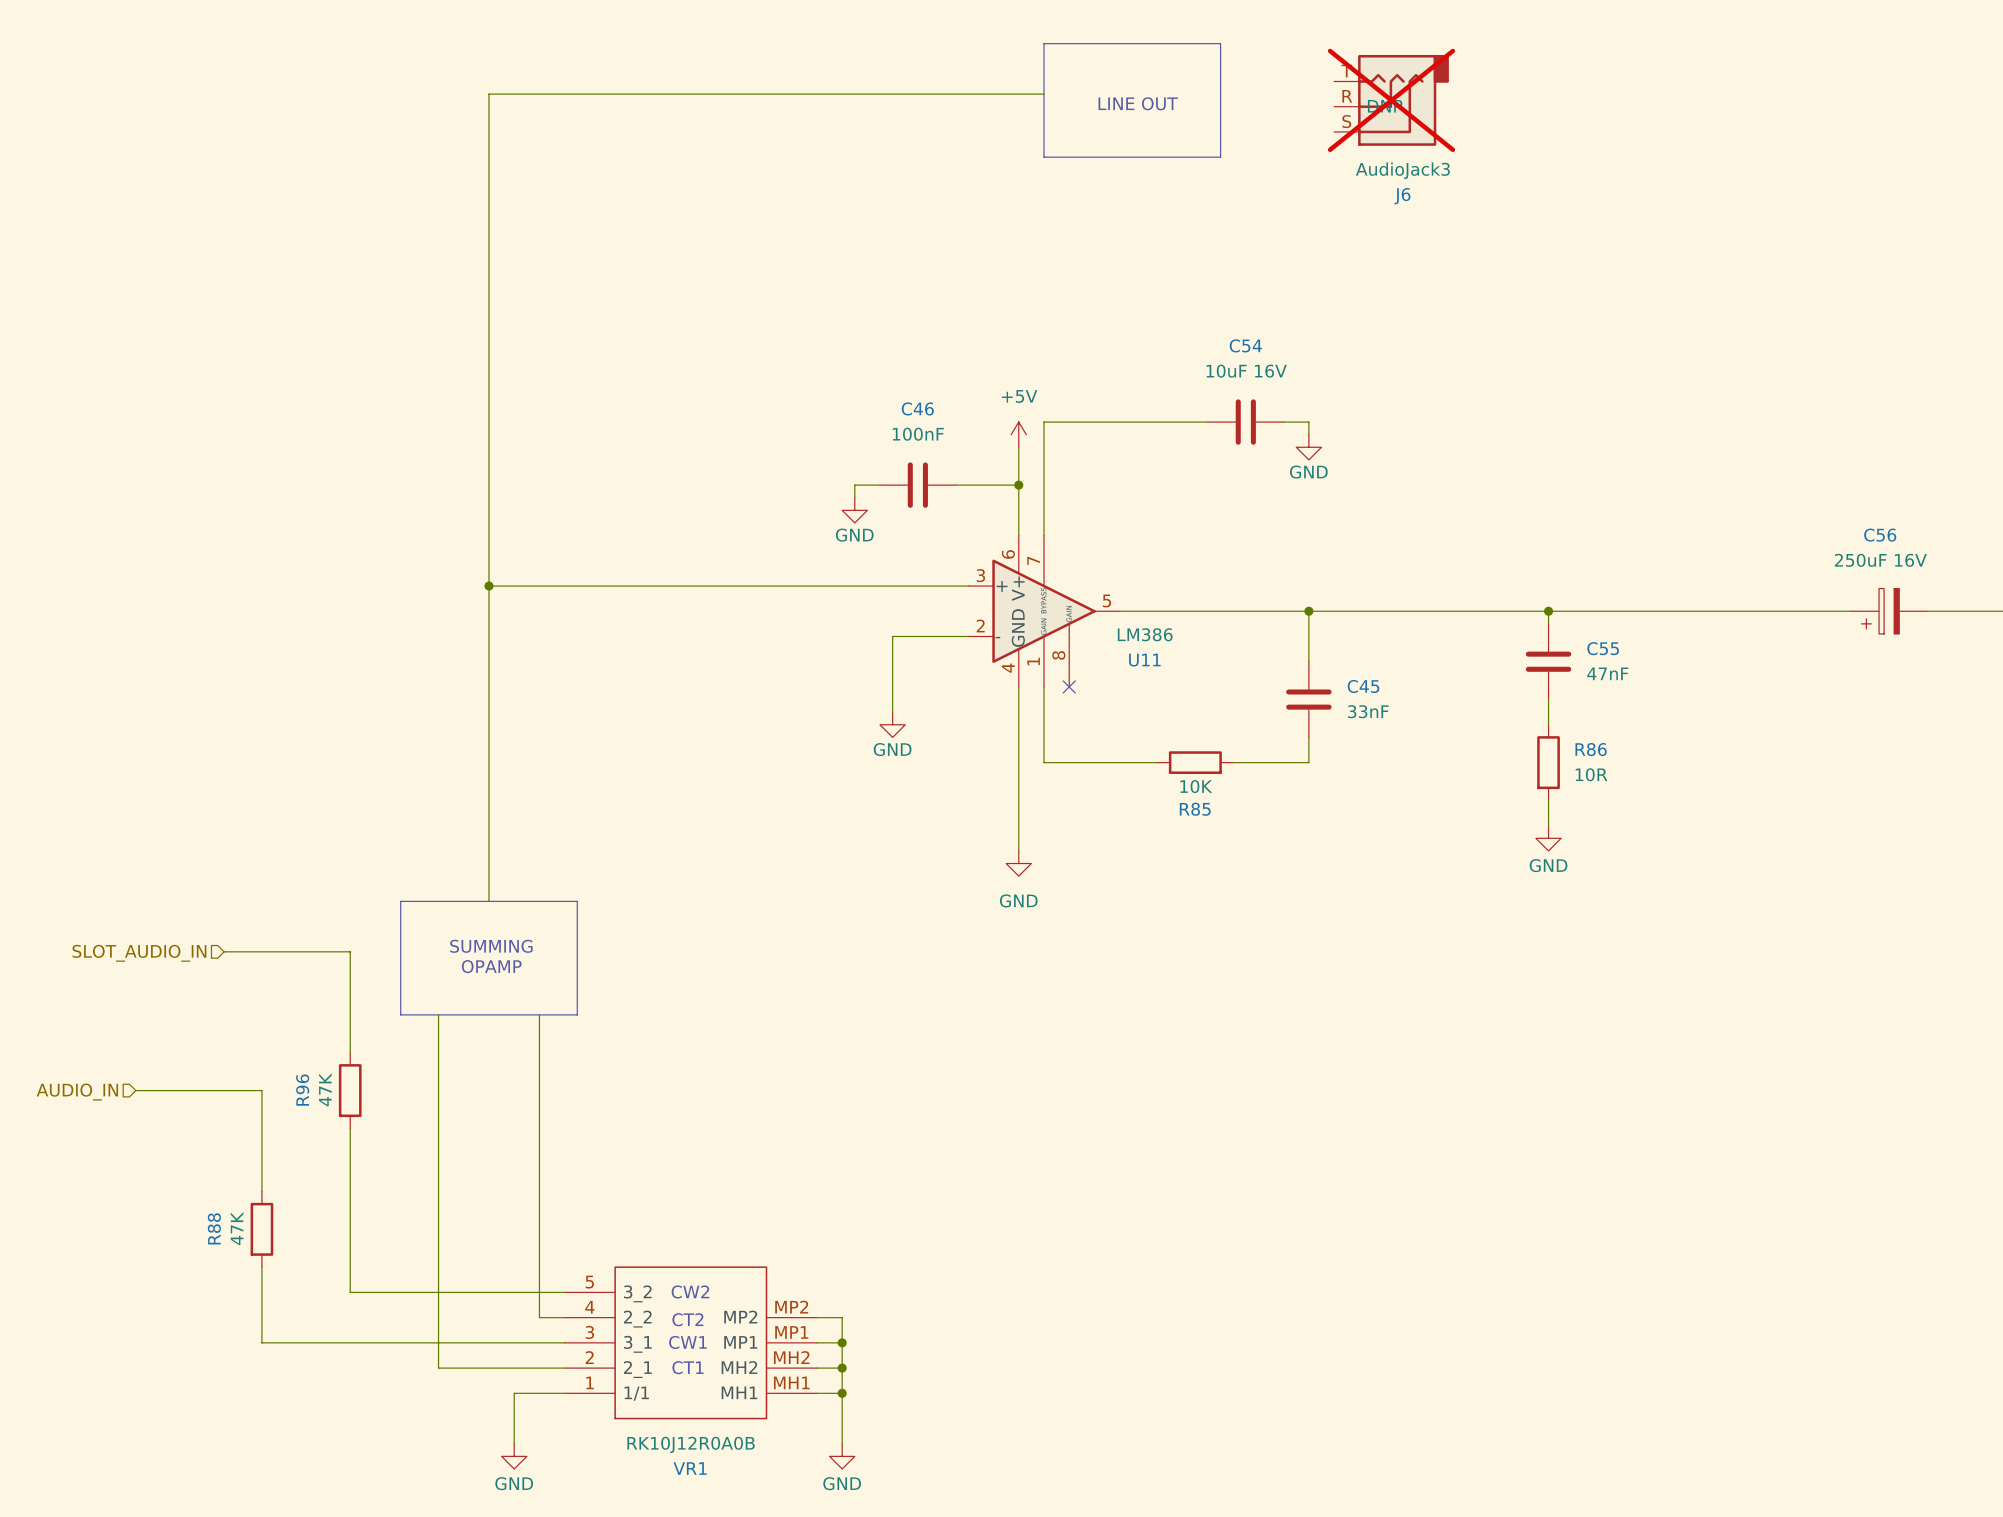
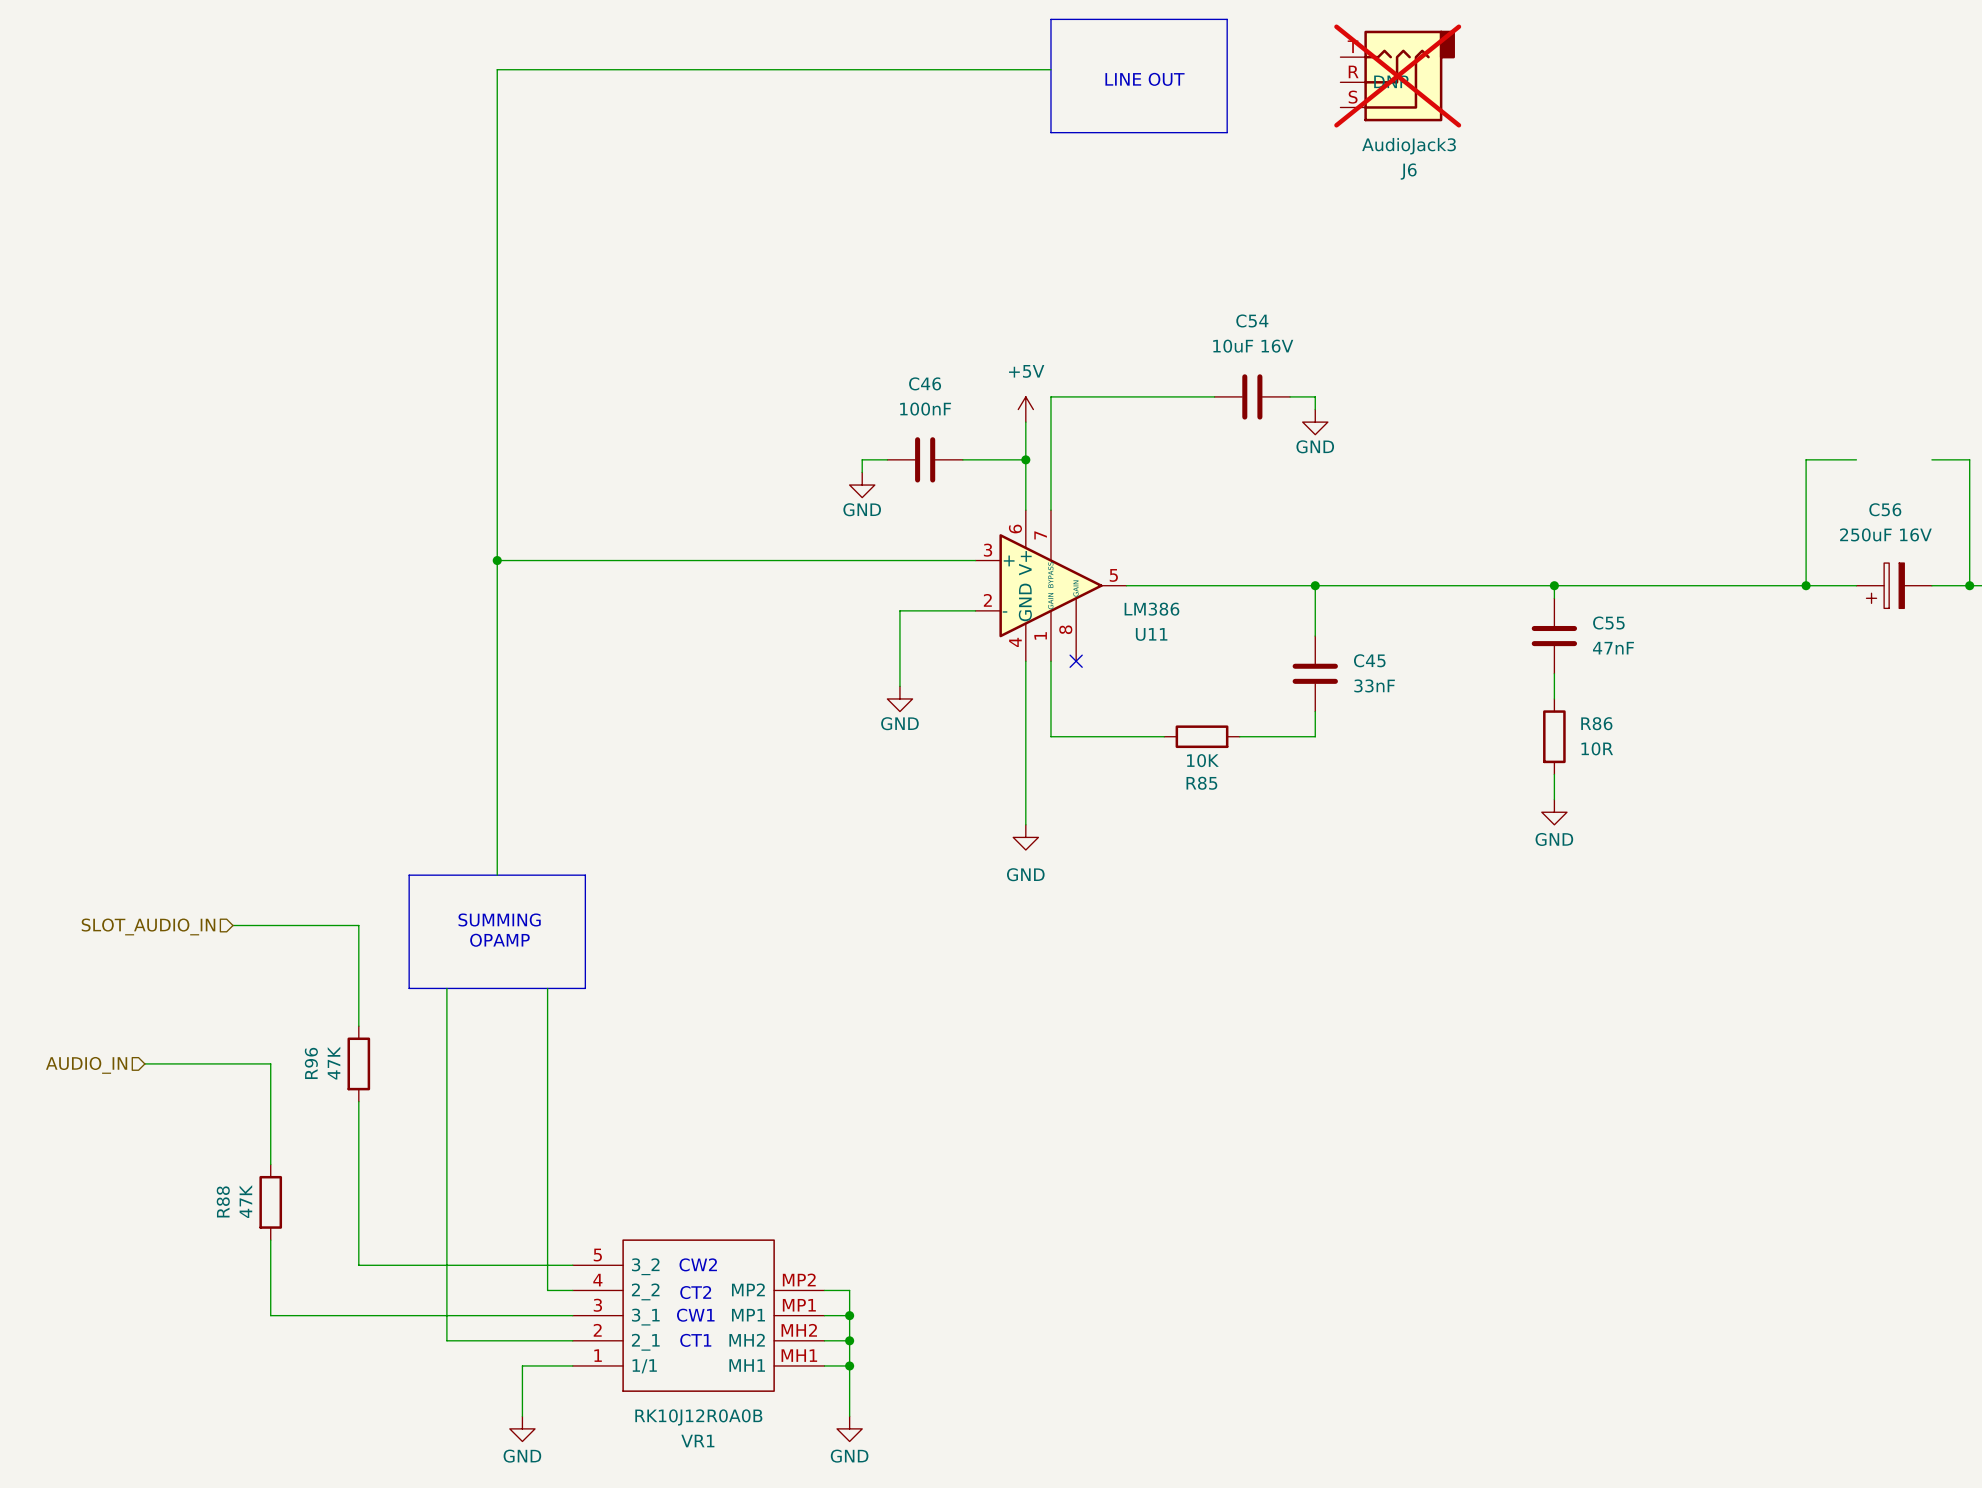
wire: none -> (1856, 459) (1806, 459) (1806, 585)
wire: none -> (1931, 459) (1969, 459) (1969, 585)
junction: none -> (1806, 585)
junction: none -> (1969, 585)

